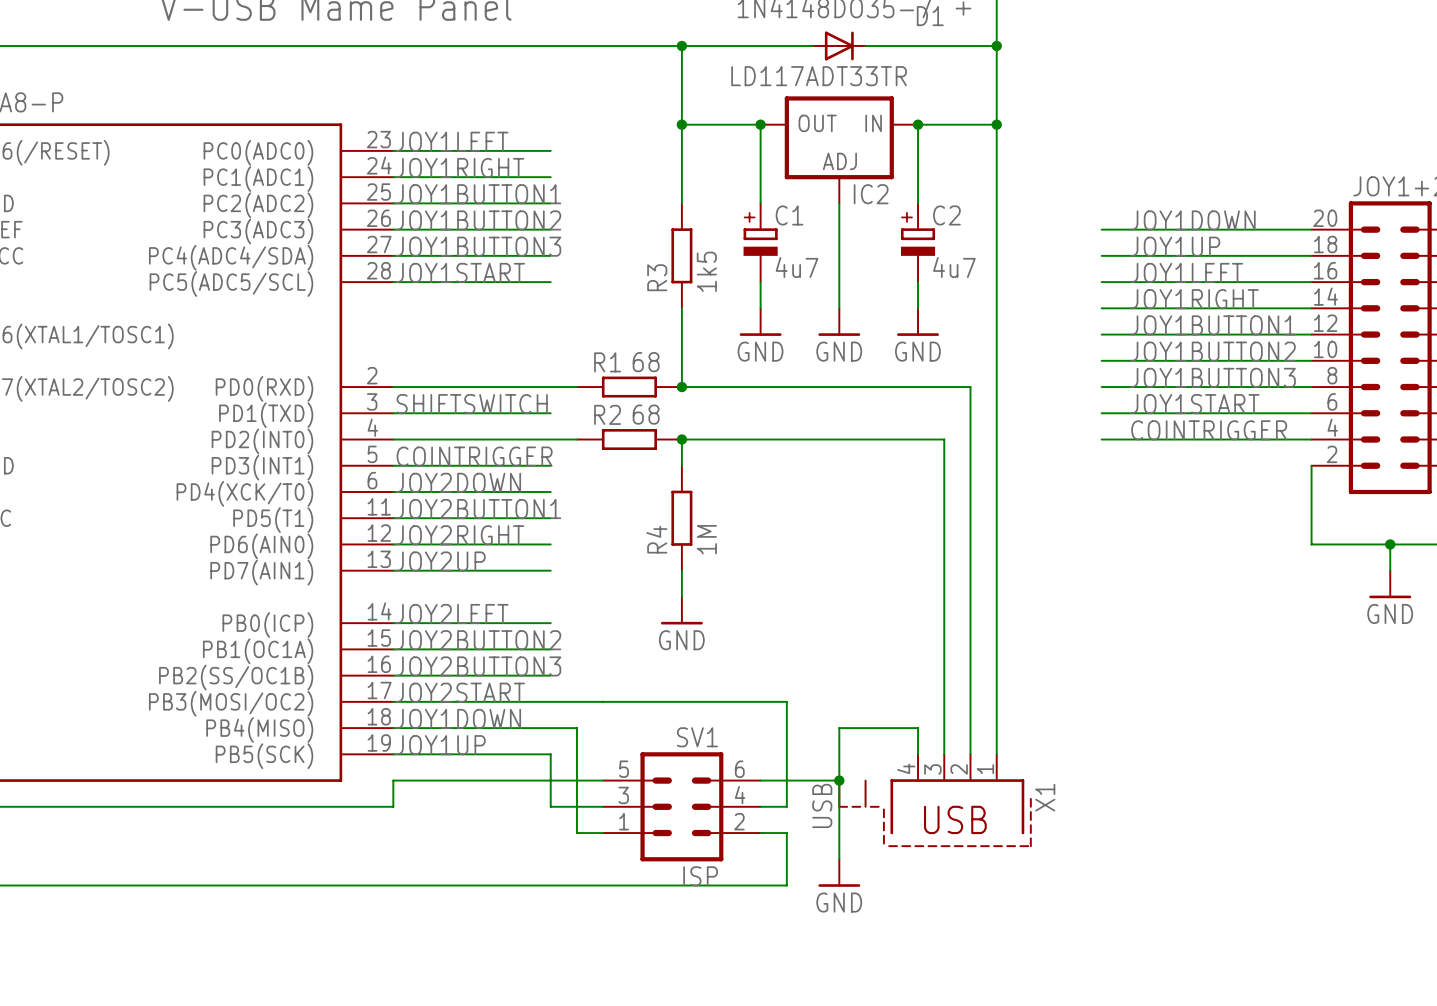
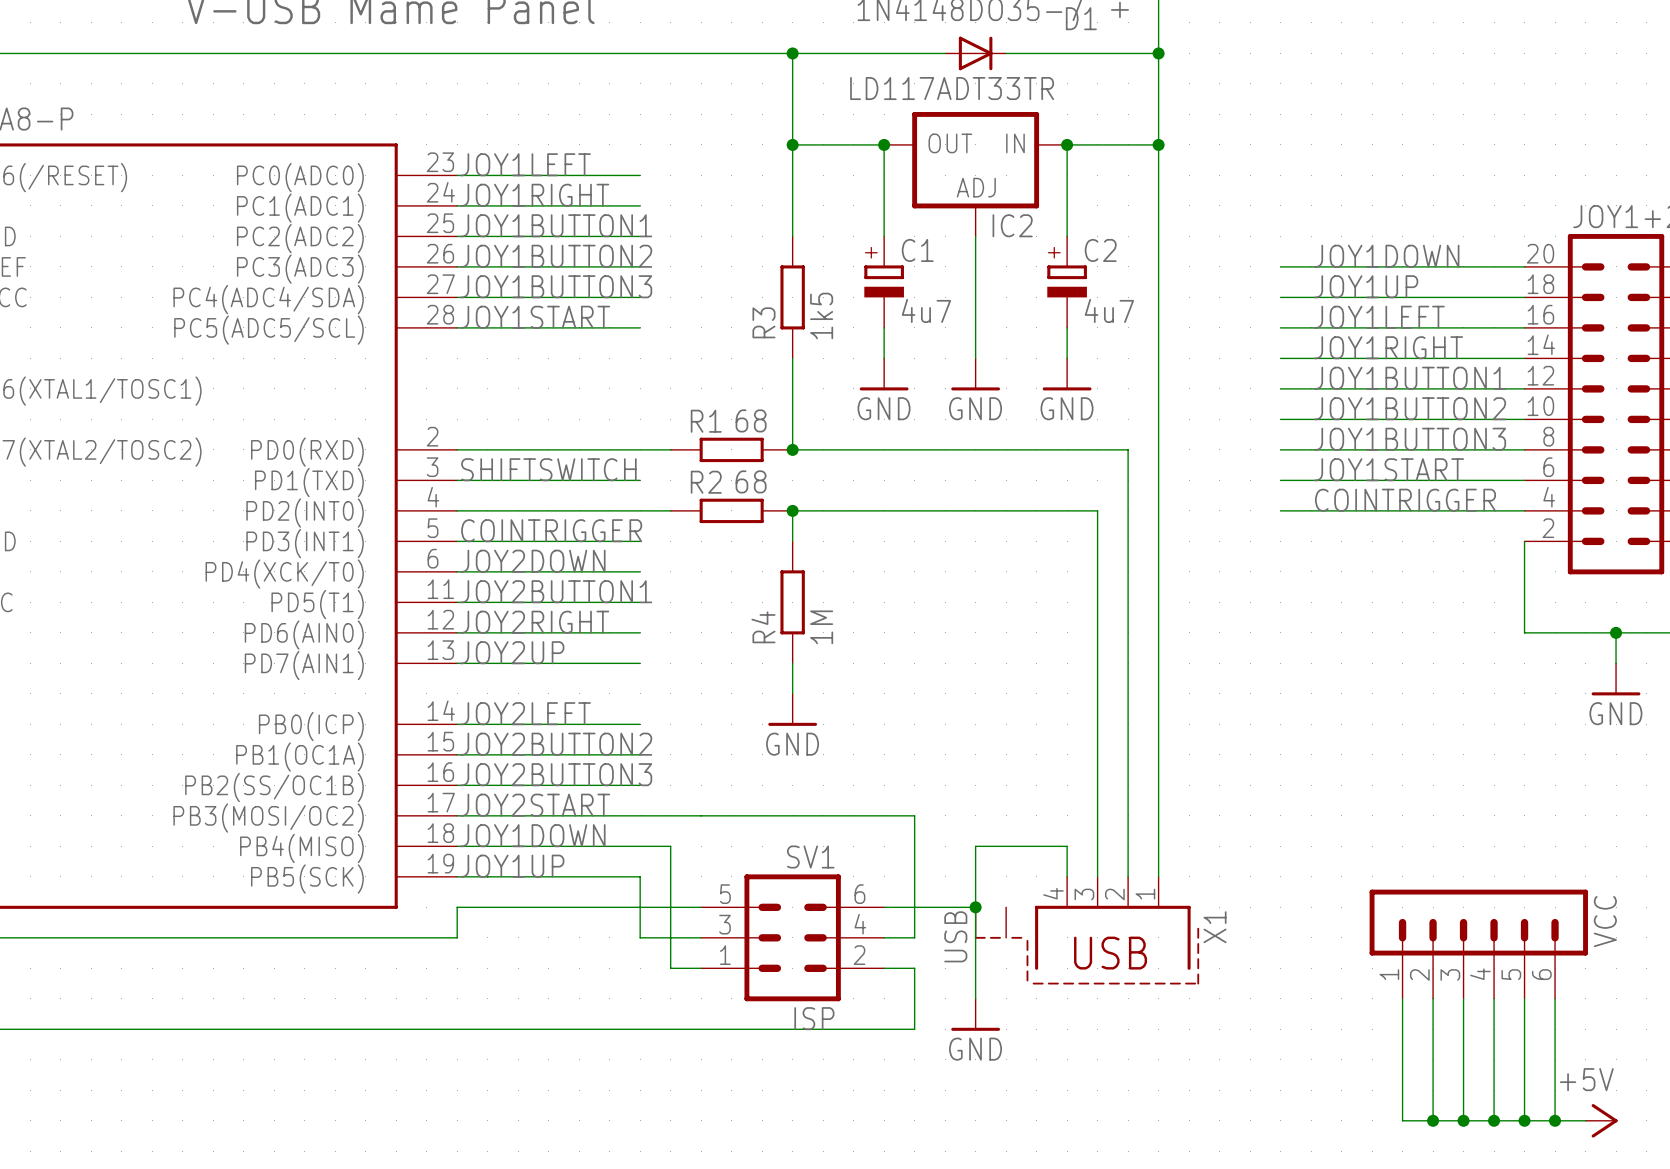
VCC: none -> (1478, 944)
wire: none -> (1402, 998) (1402, 1120) (1585, 1120)
wire: none -> (1433, 998) (1433, 1120)
wire: none -> (1463, 998) (1463, 1120)
wire: none -> (1494, 998) (1494, 1120)
wire: none -> (1524, 998) (1524, 1120)
wire: none -> (1555, 998) (1555, 1120)
junction: none -> (1433, 1120)
junction: none -> (1463, 1120)
junction: none -> (1494, 1120)
junction: none -> (1524, 1120)
junction: none -> (1555, 1120)
power symbol: none -> +5V (1601, 1120)

